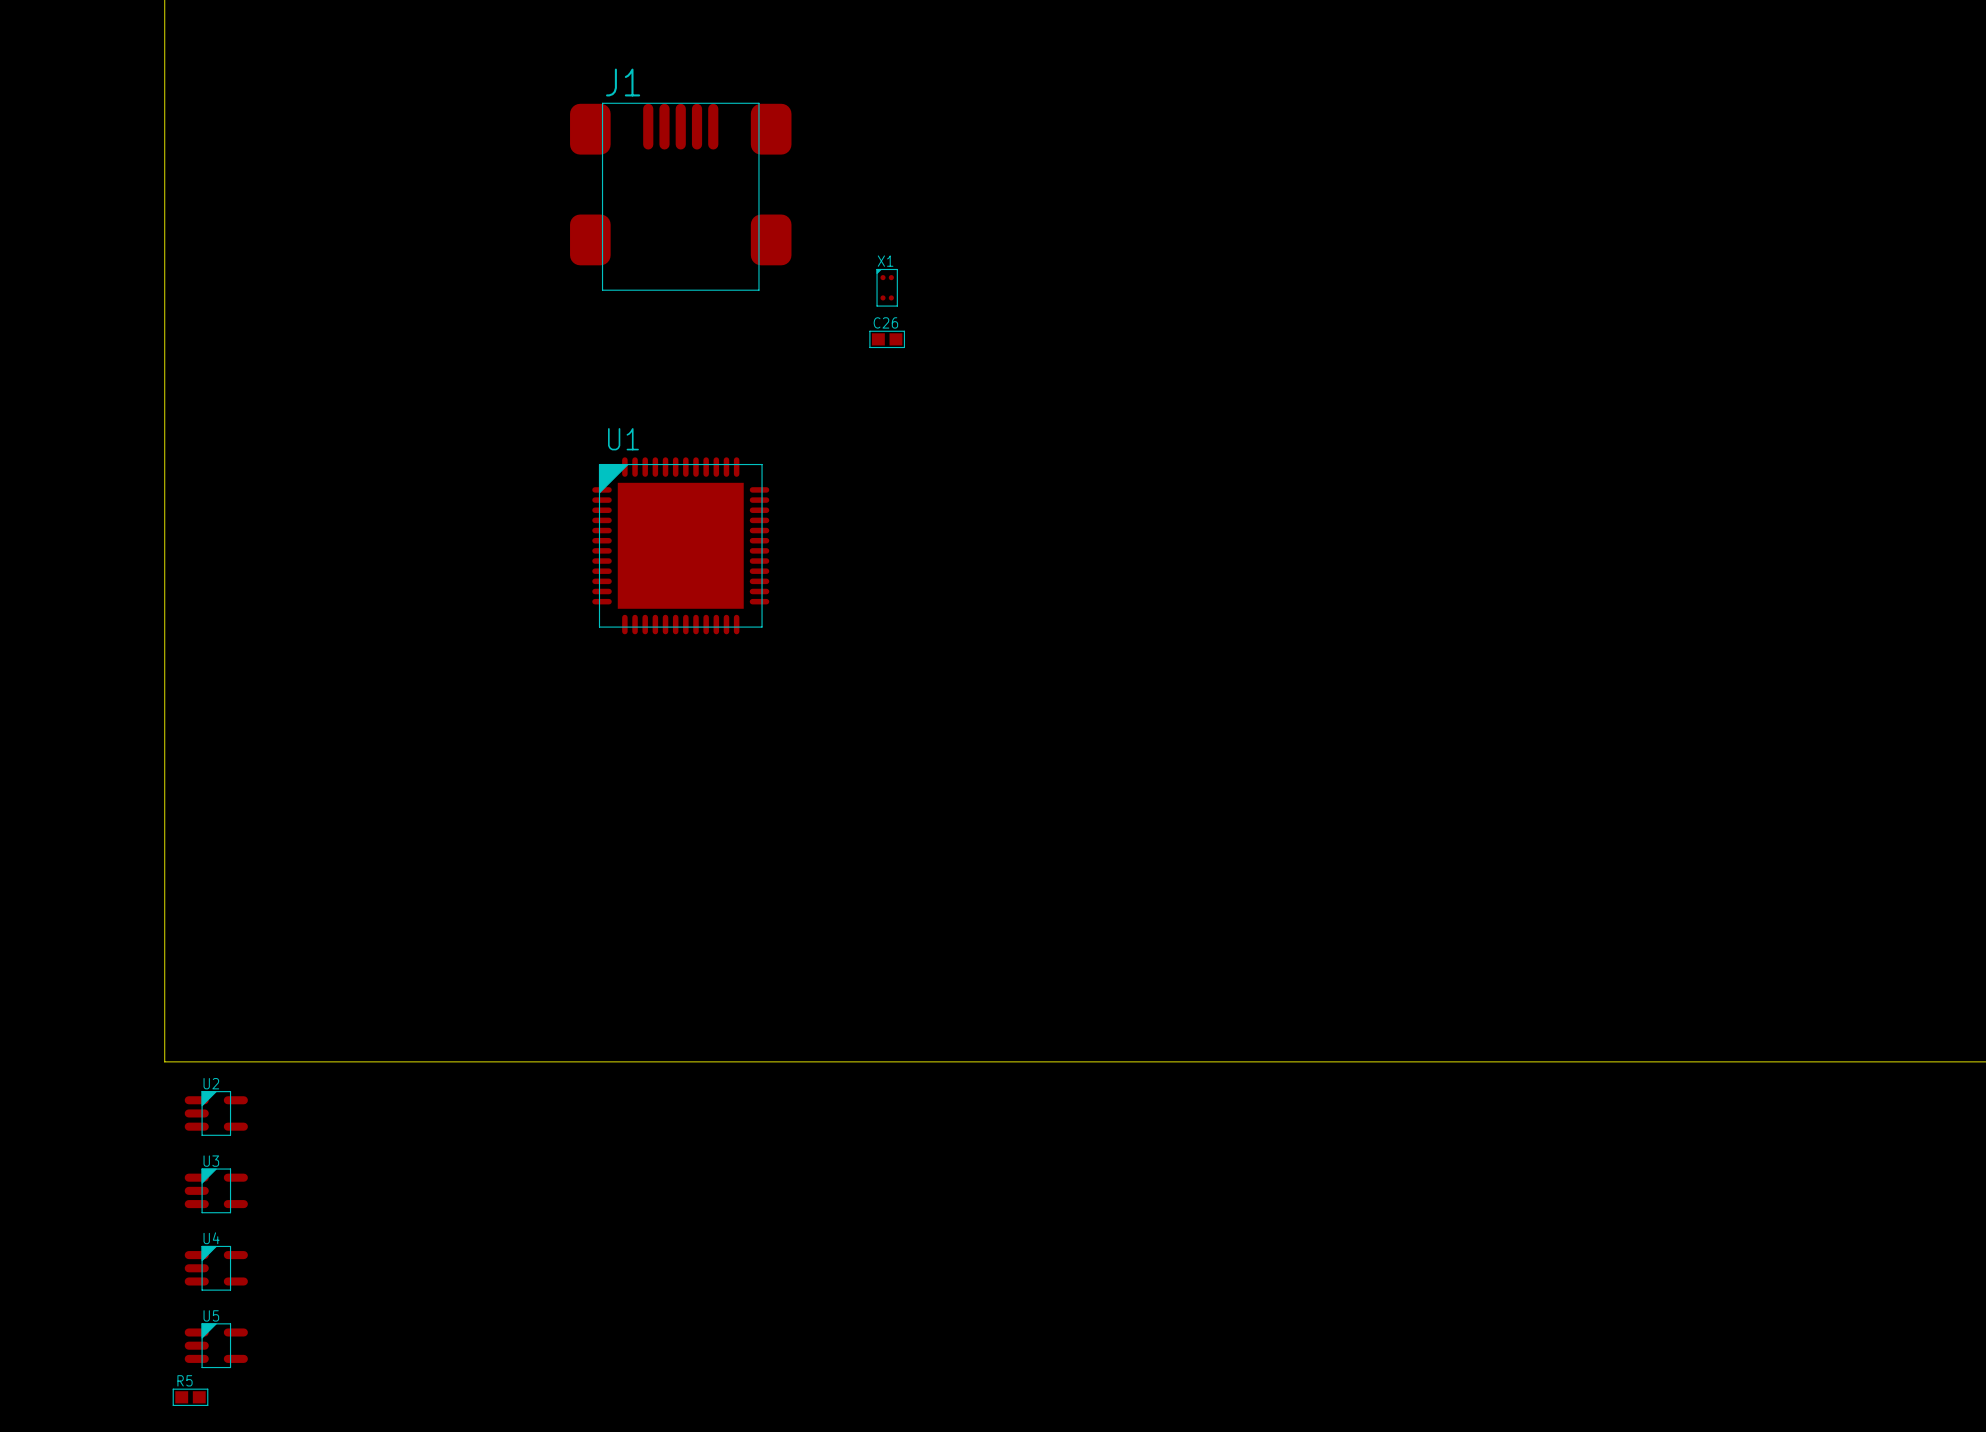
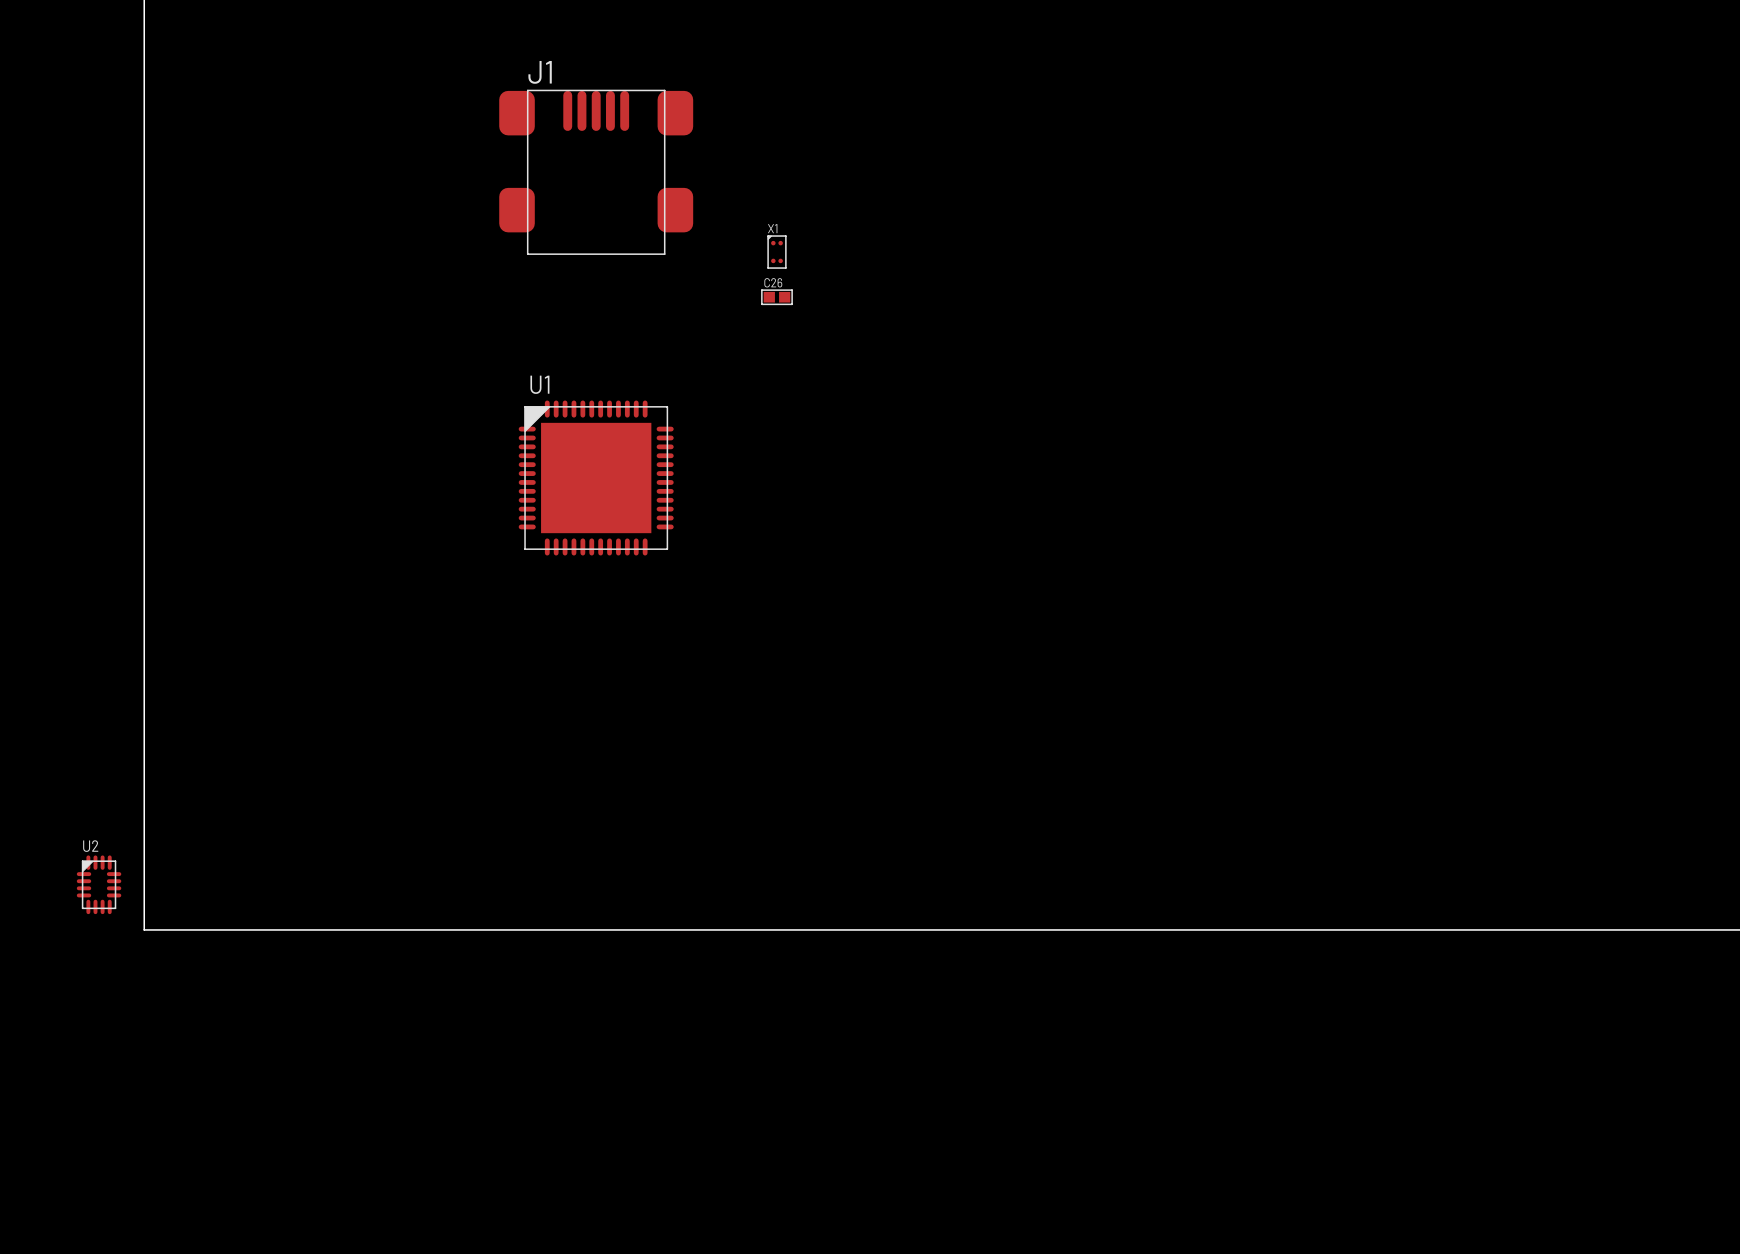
U2 footprint: [184, 1091, 248, 1136] -> [76, 855, 122, 915]
U3: (216, 1190) -> none
U4: (216, 1268) -> none
U5: (216, 1345) -> none
R5: (190, 1397) -> none

